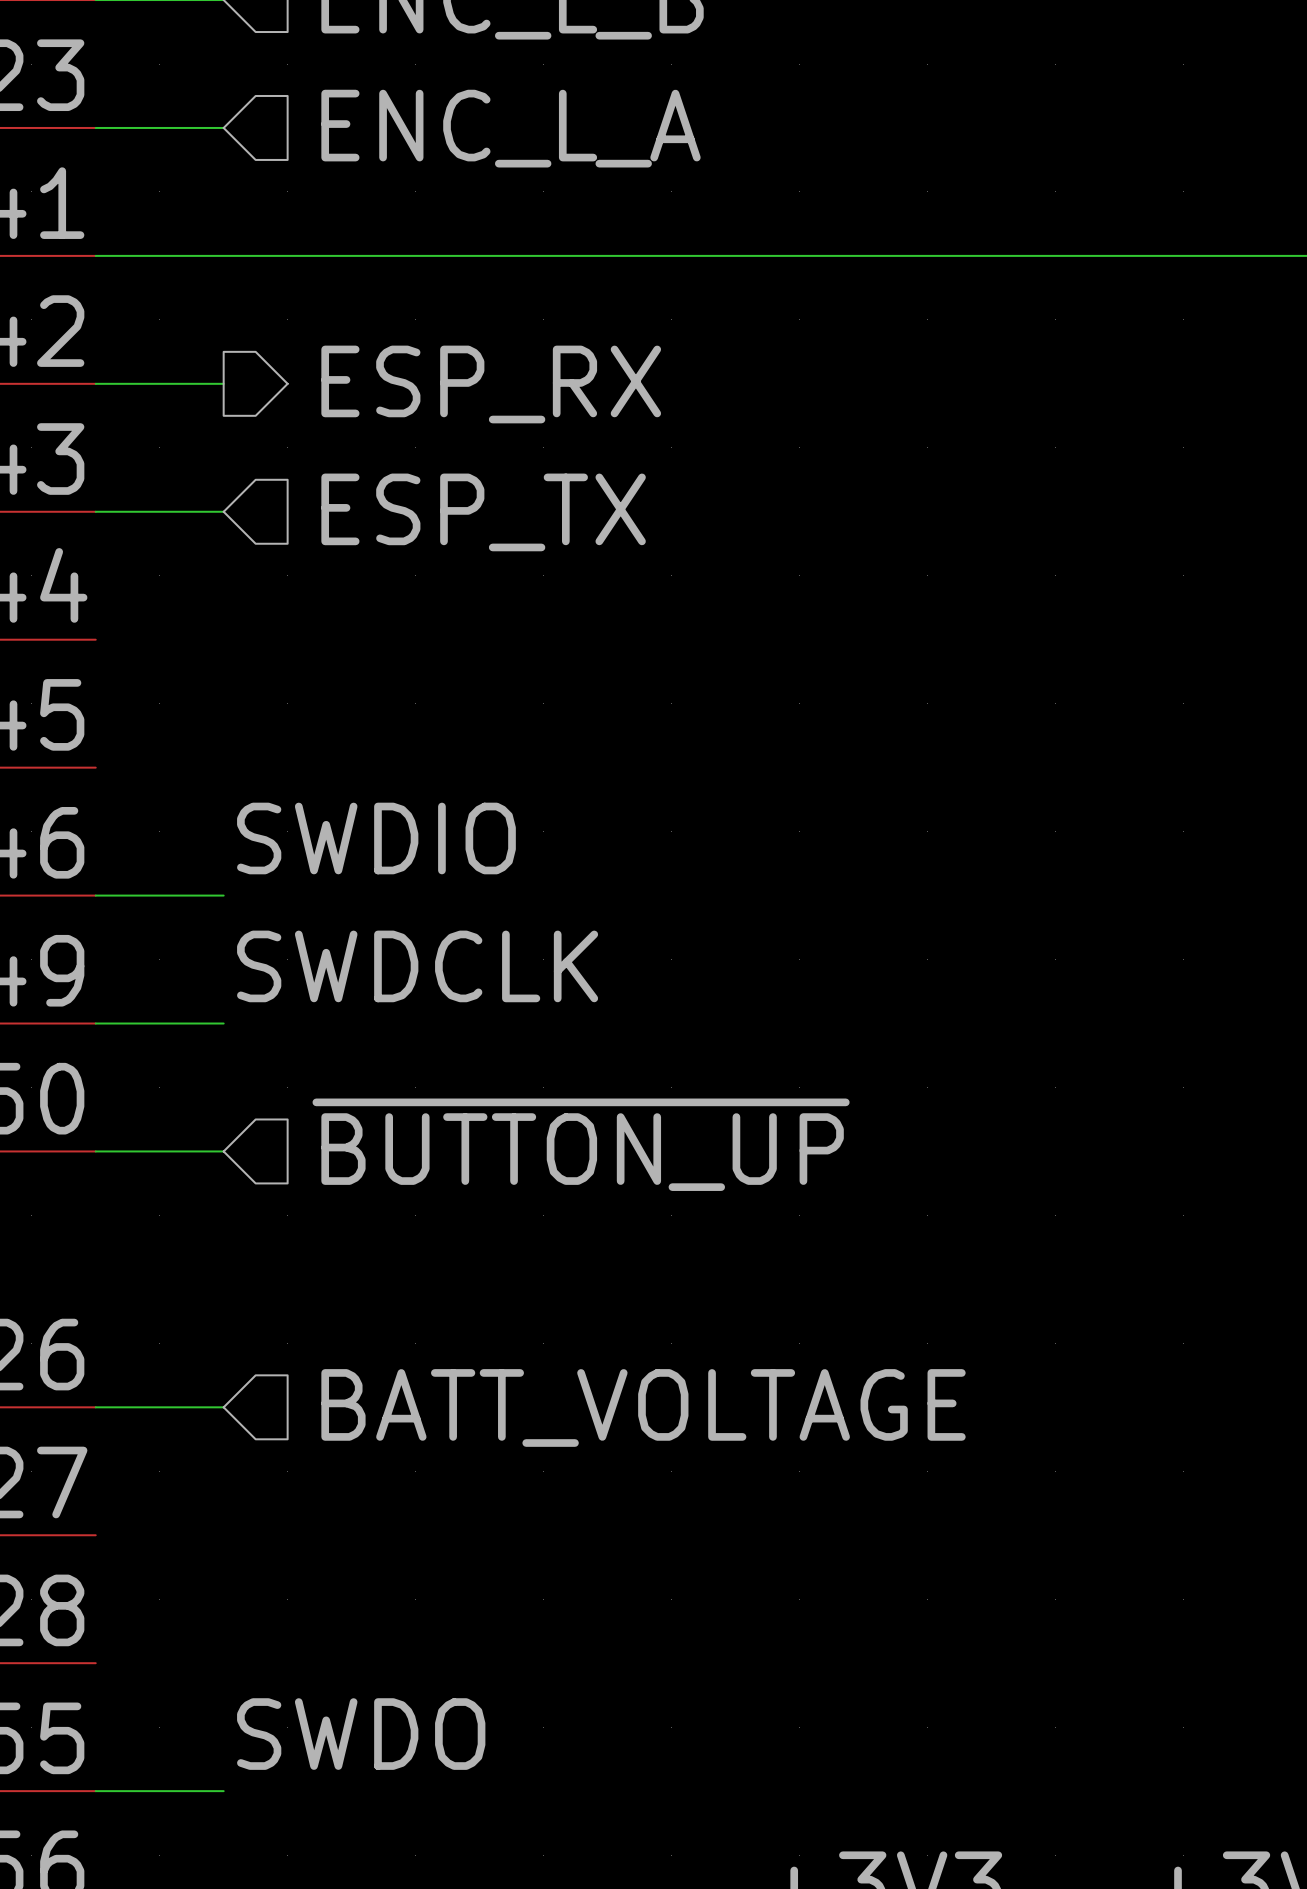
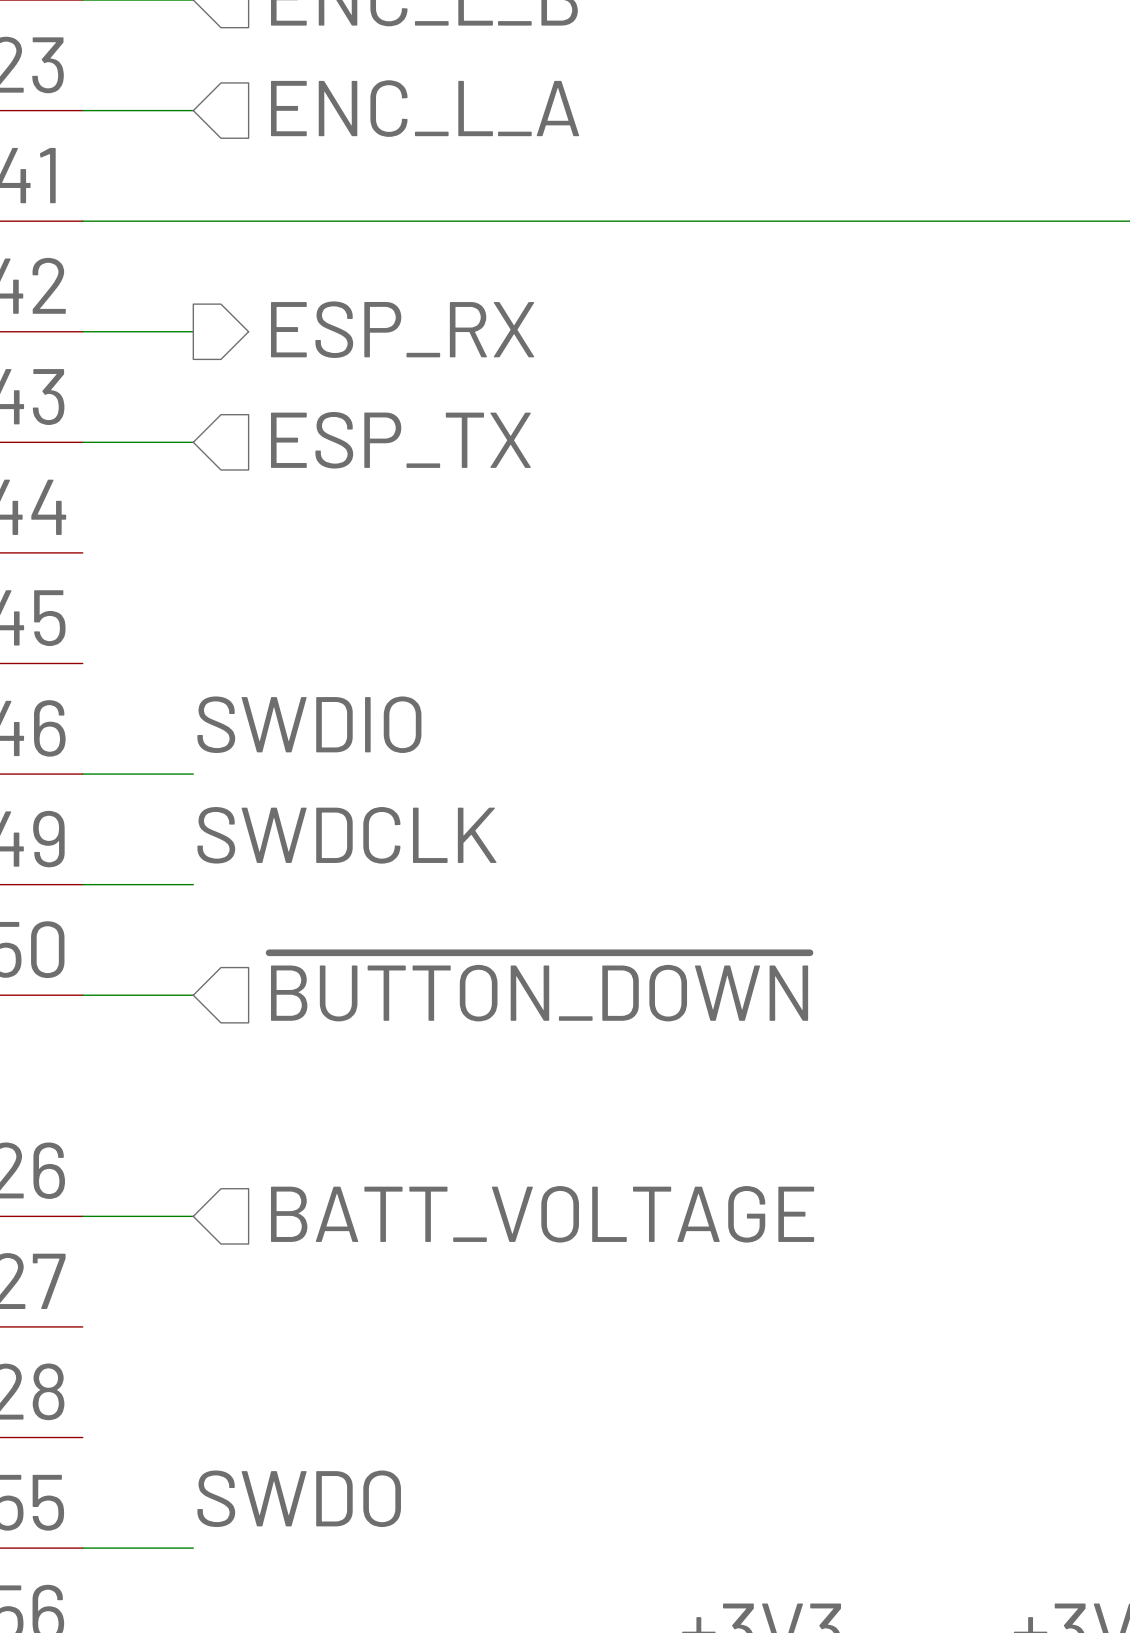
hierarchical label: ~{BUTTON_UP} (581, 1144) -> ~{BUTTON_DOWN} (539, 987)

